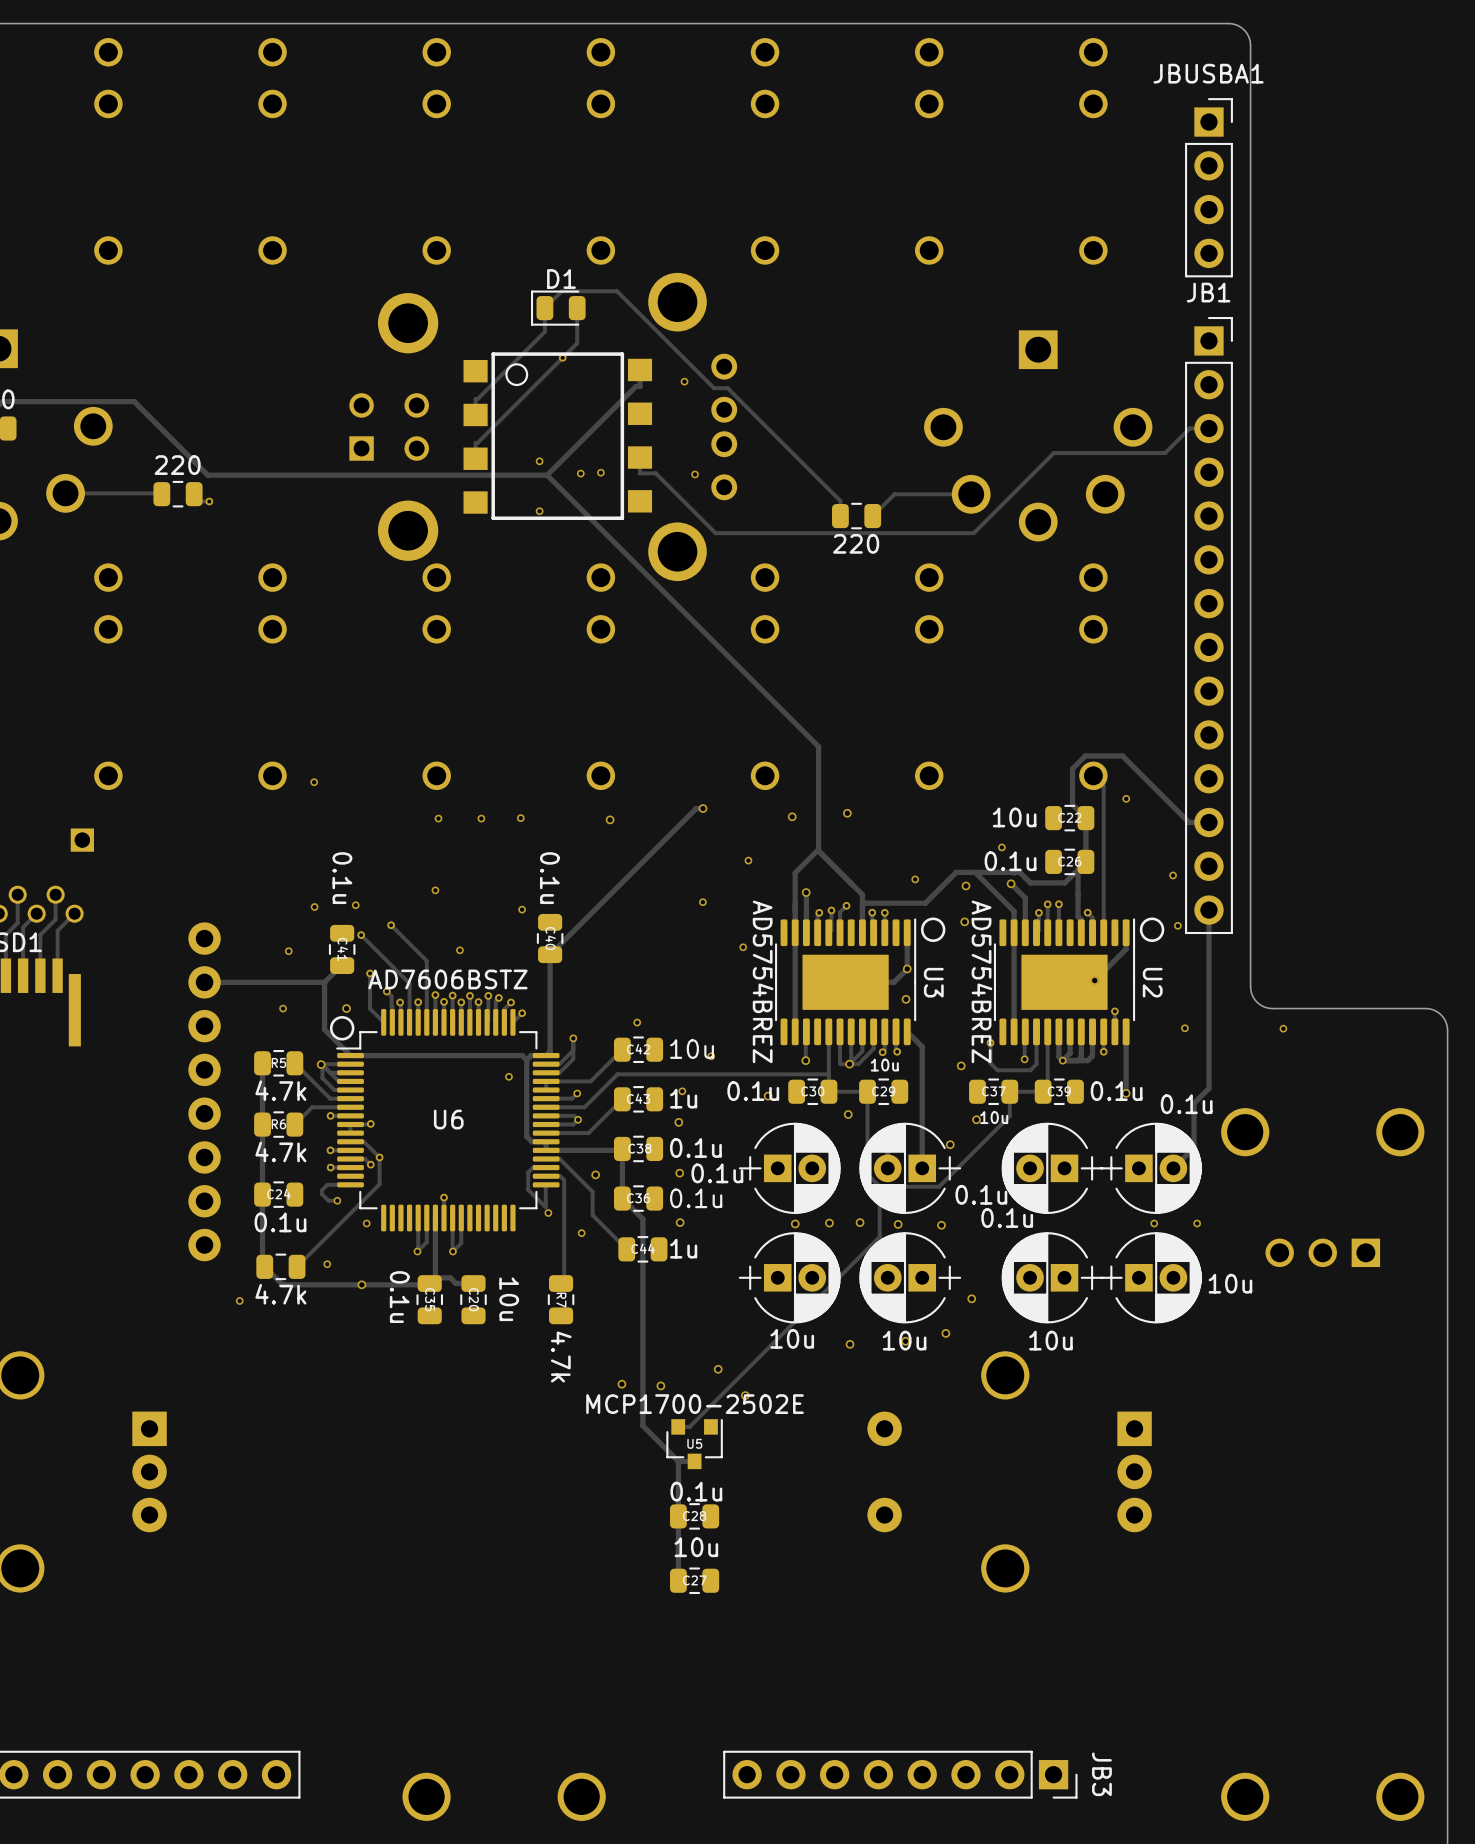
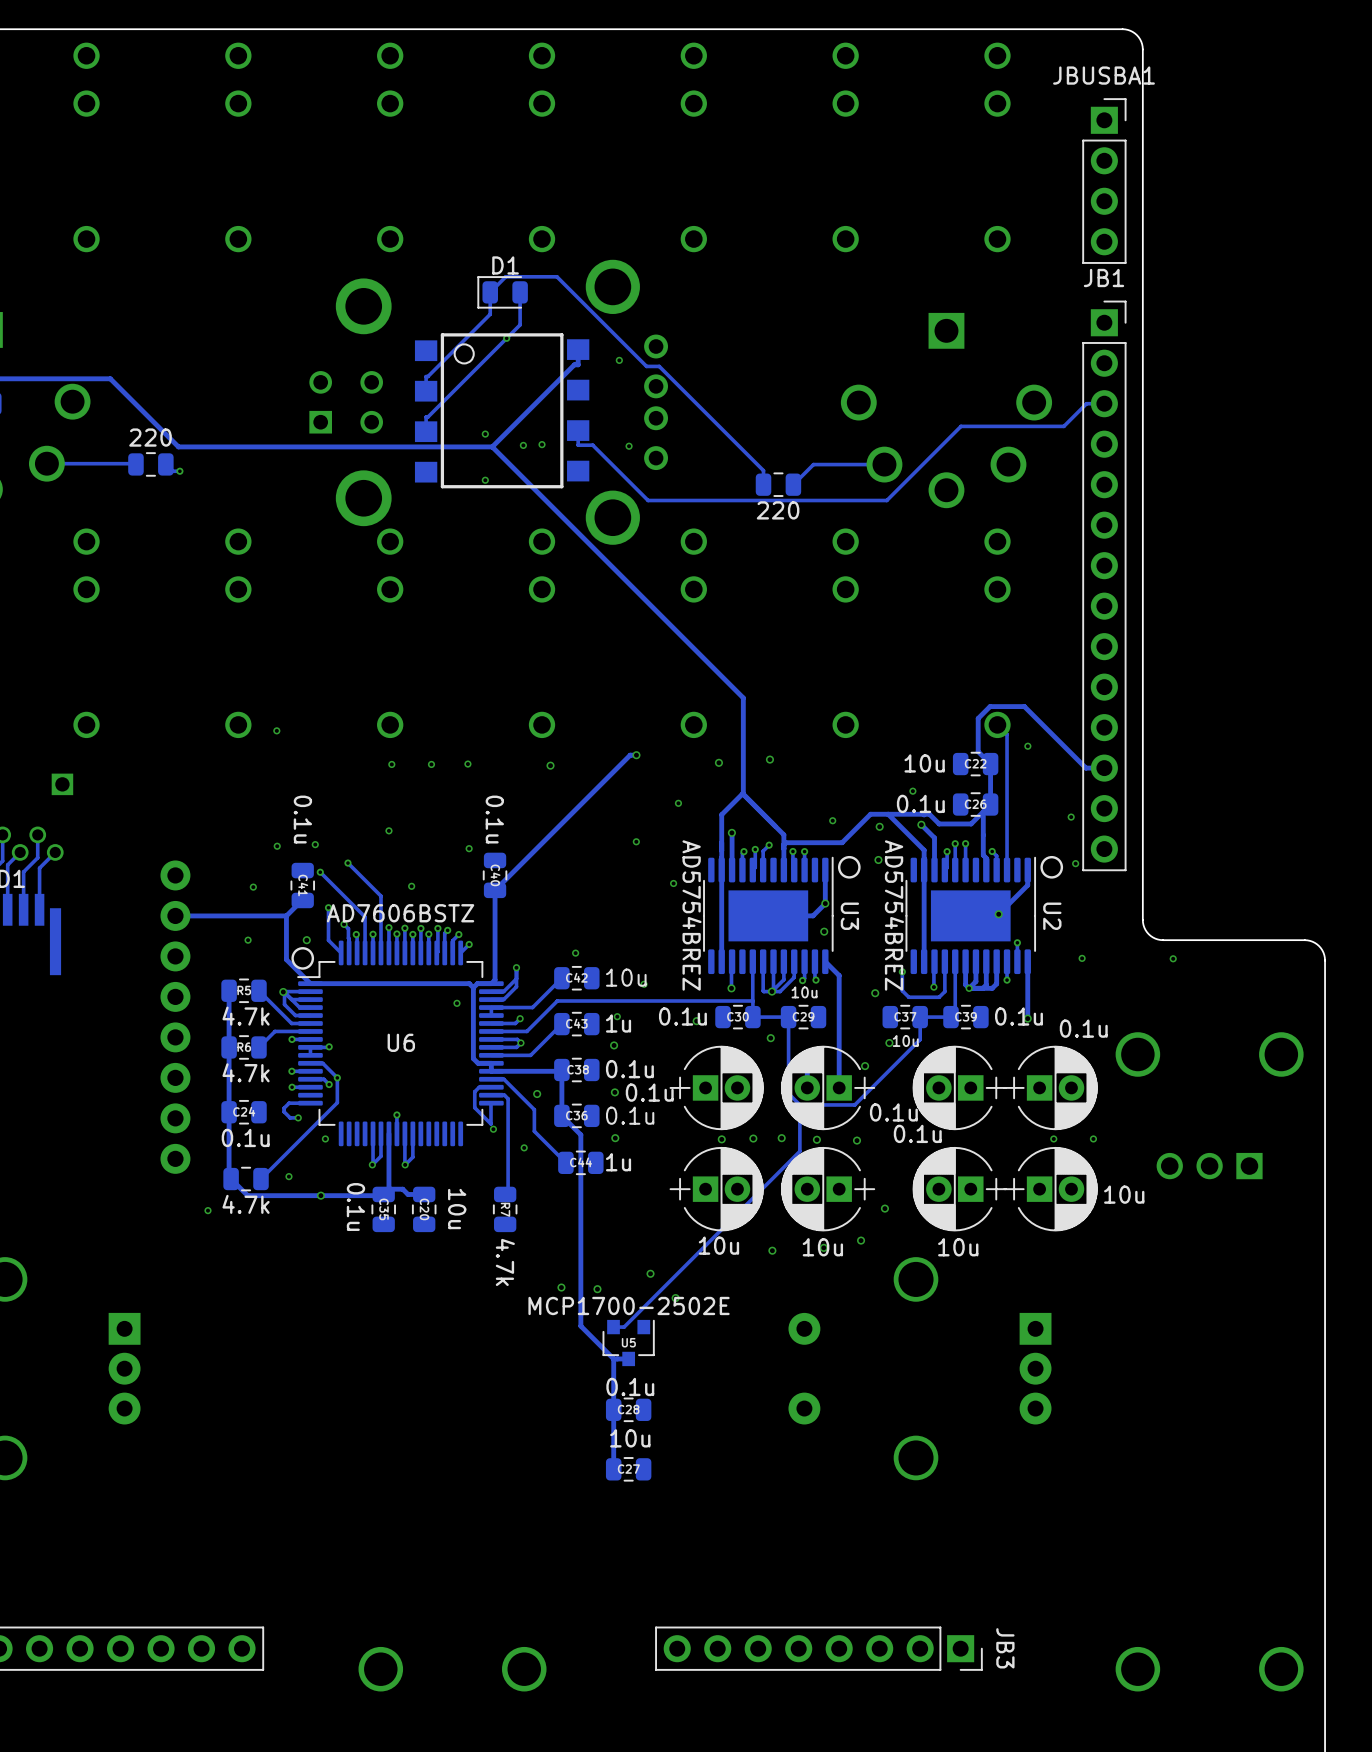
track: (1208, 910) (1208, 1088) (1194, 1103) (1194, 1147) (1173, 1168) -> none

